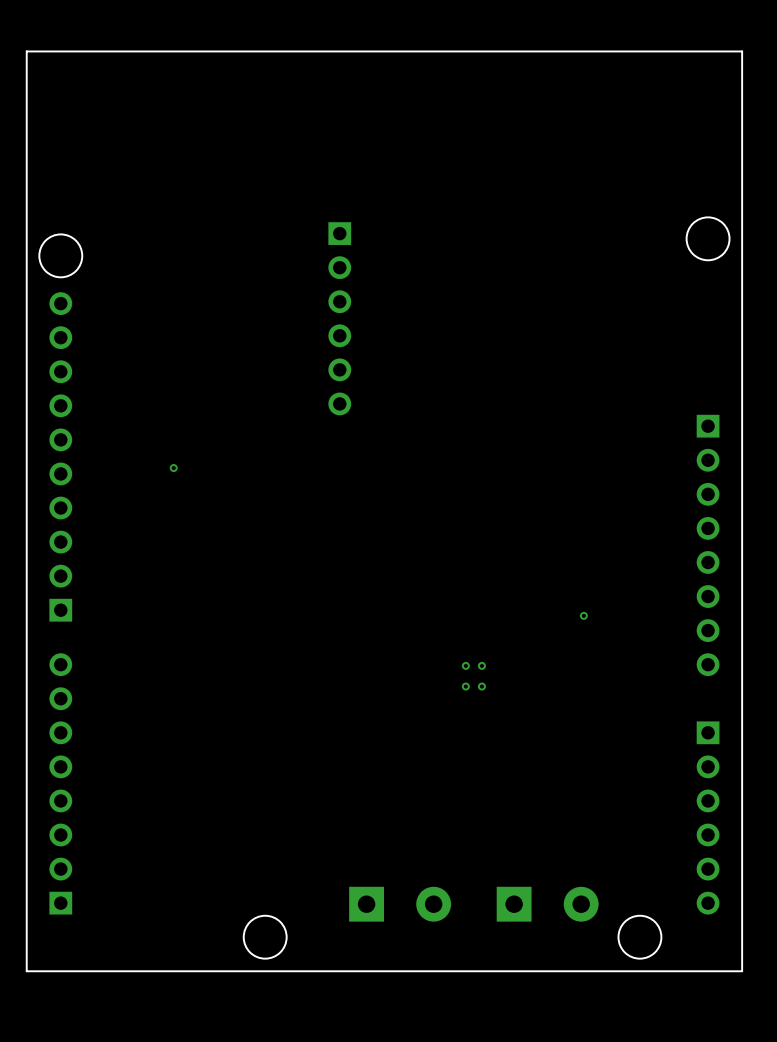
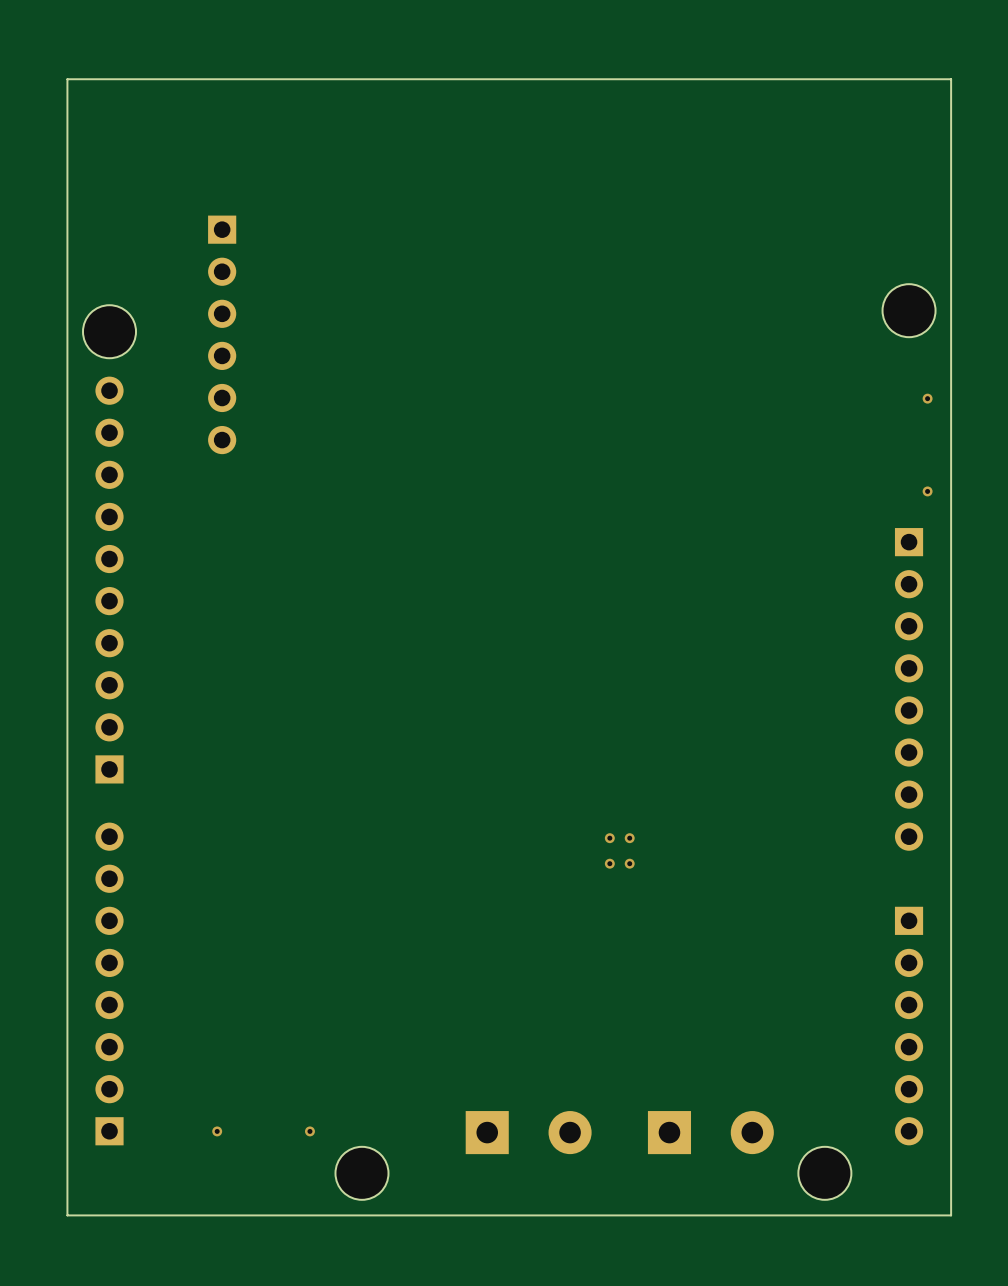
via: none -> (927, 398)
part position: (339, 318) -> (222, 334)
via: none -> (927, 491)
via: (173, 468) -> none
via: (583, 615) -> none
via: none -> (217, 1131)
via: none -> (309, 1131)

